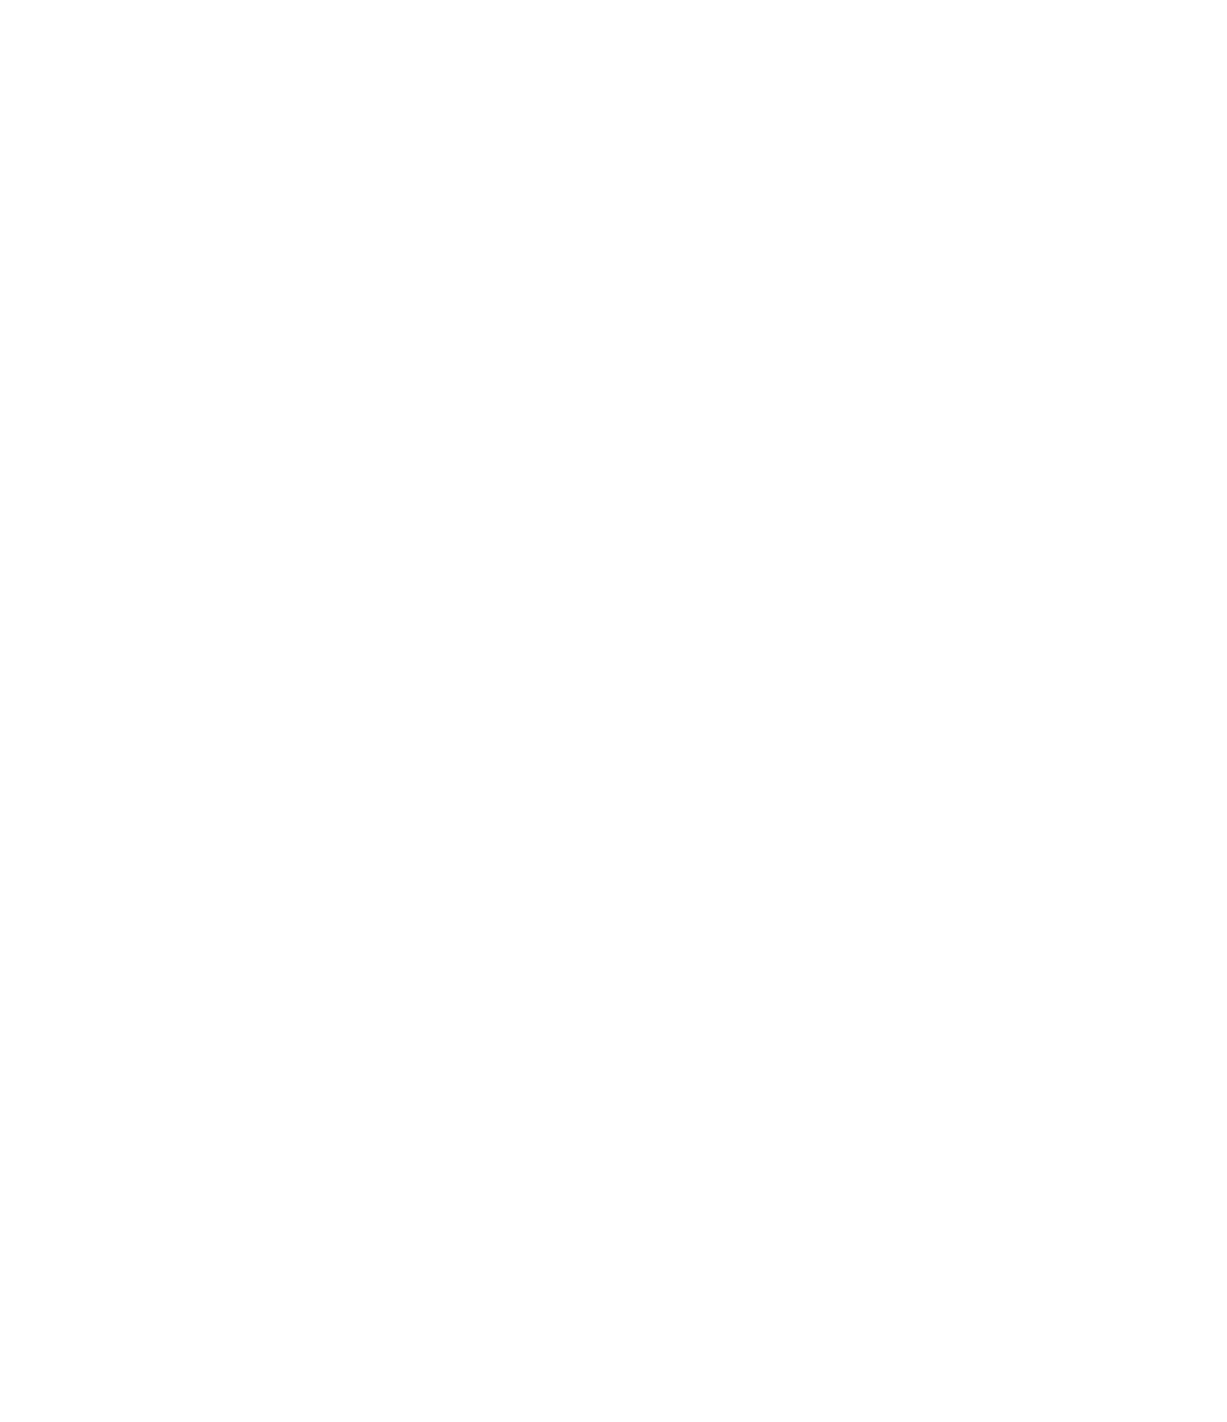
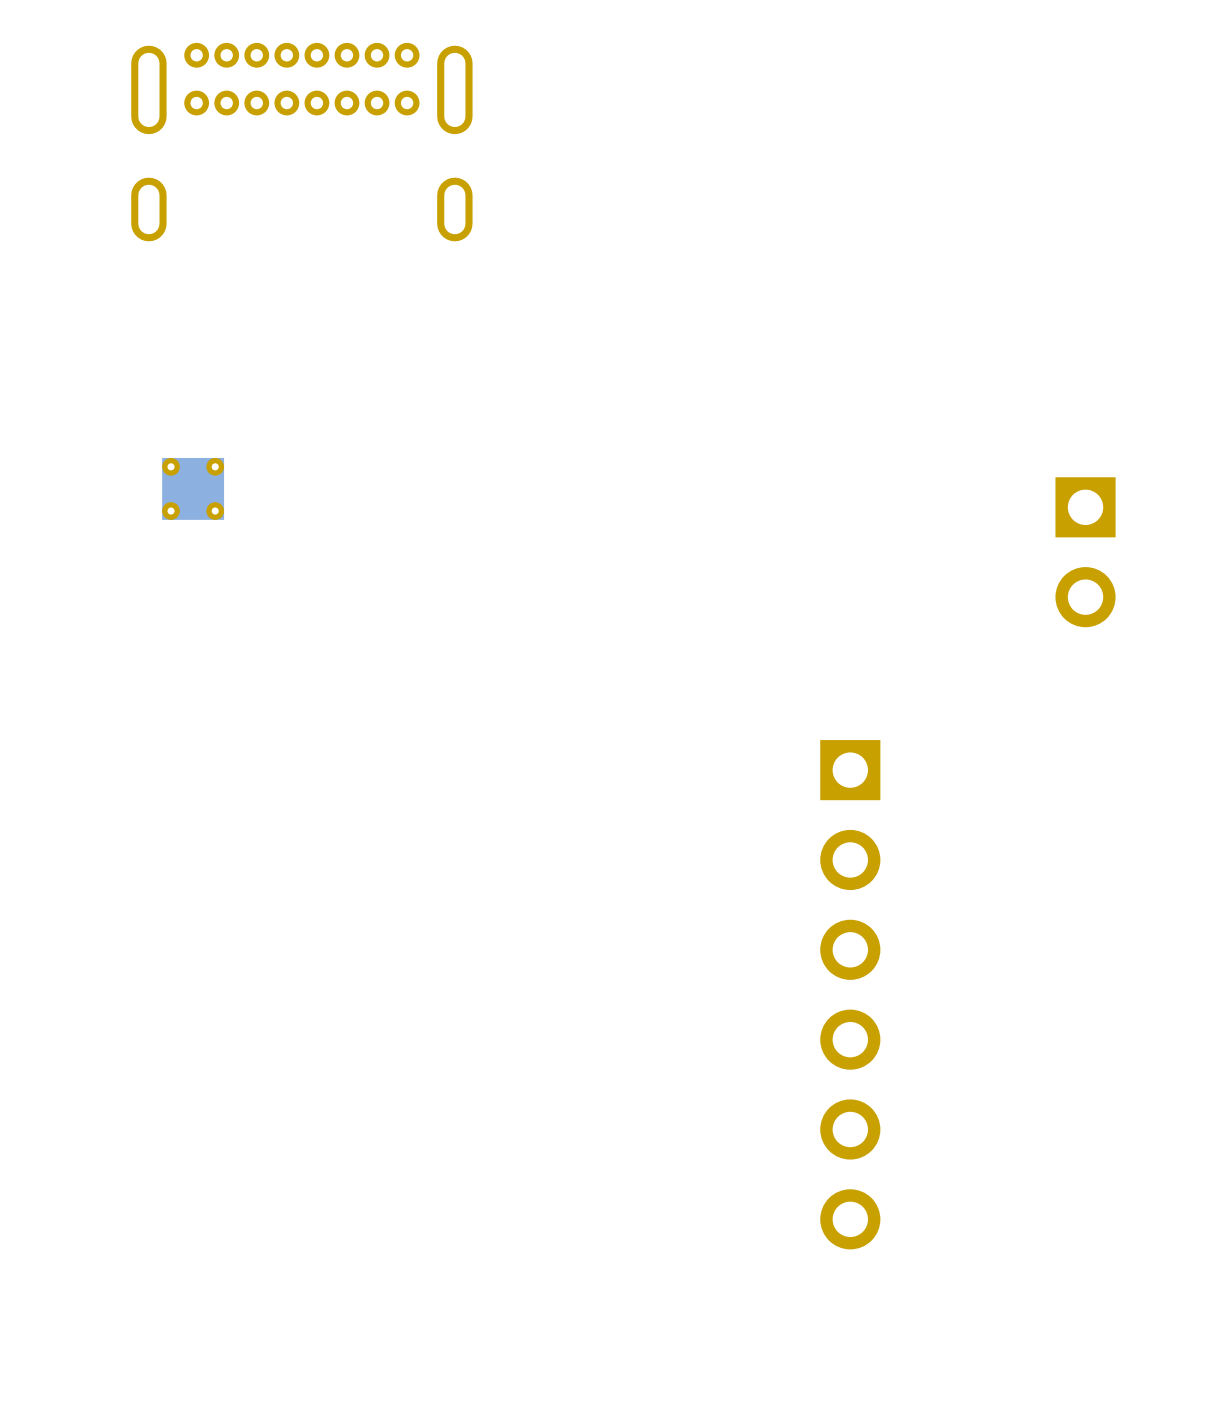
part: none -> (301, 142)
part: none -> (193, 488)
part: none -> (1085, 552)
part: none -> (850, 994)

